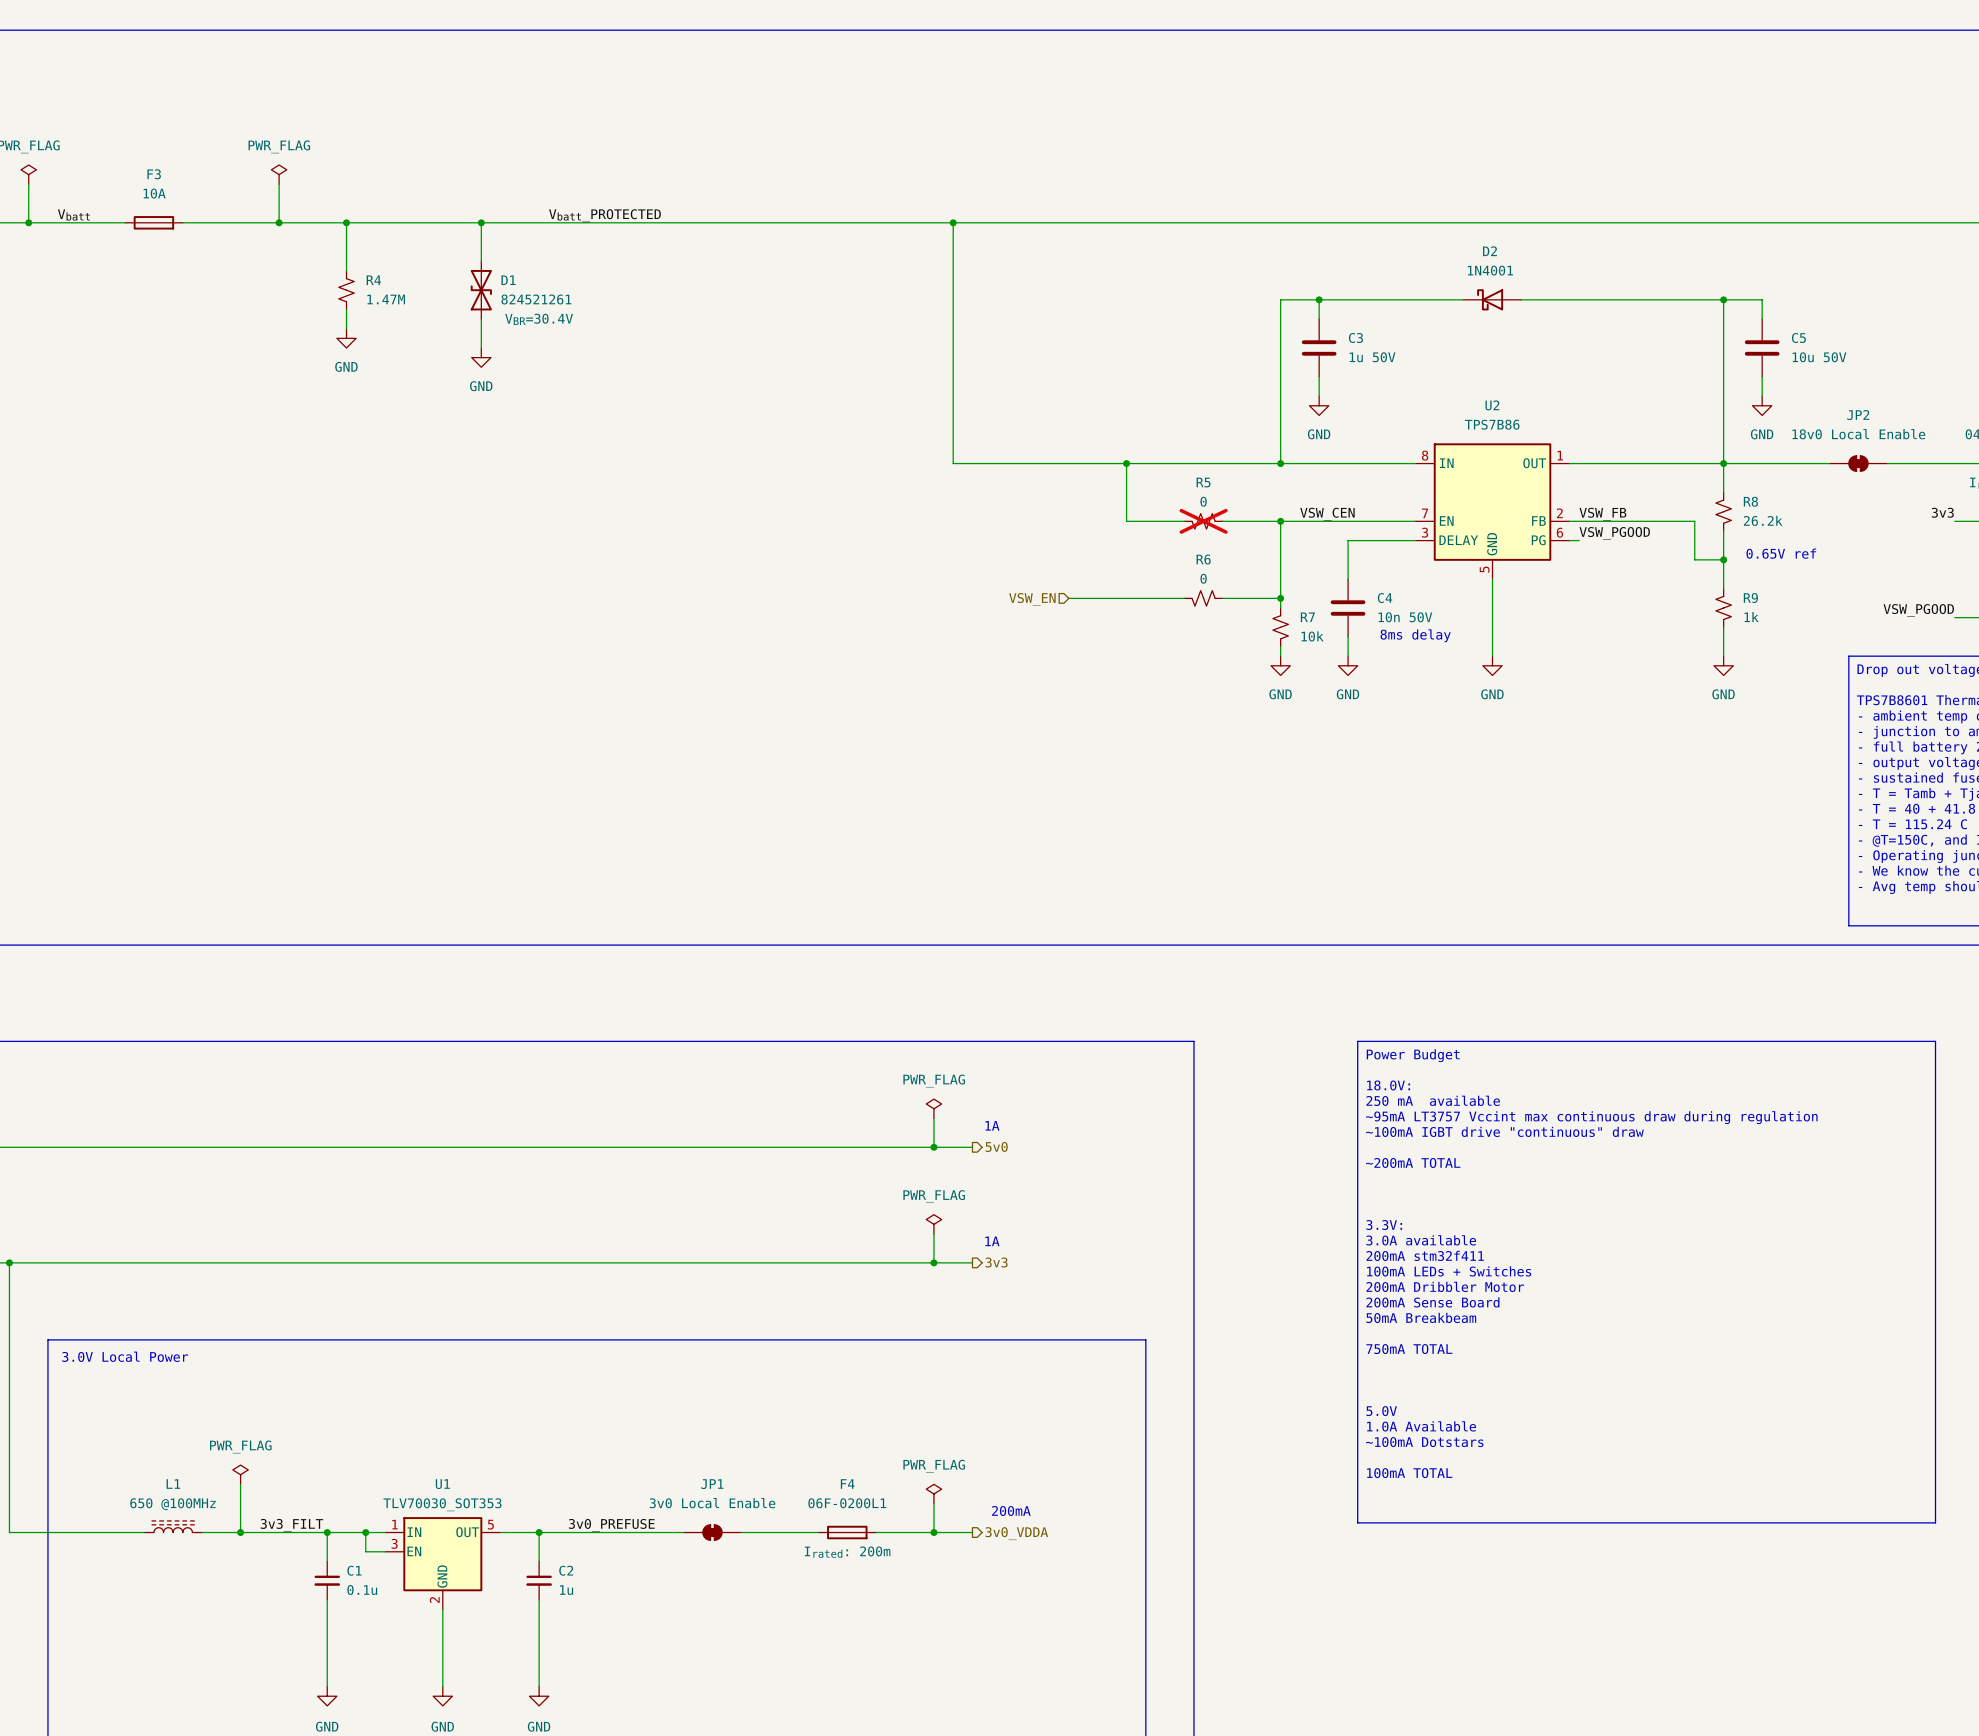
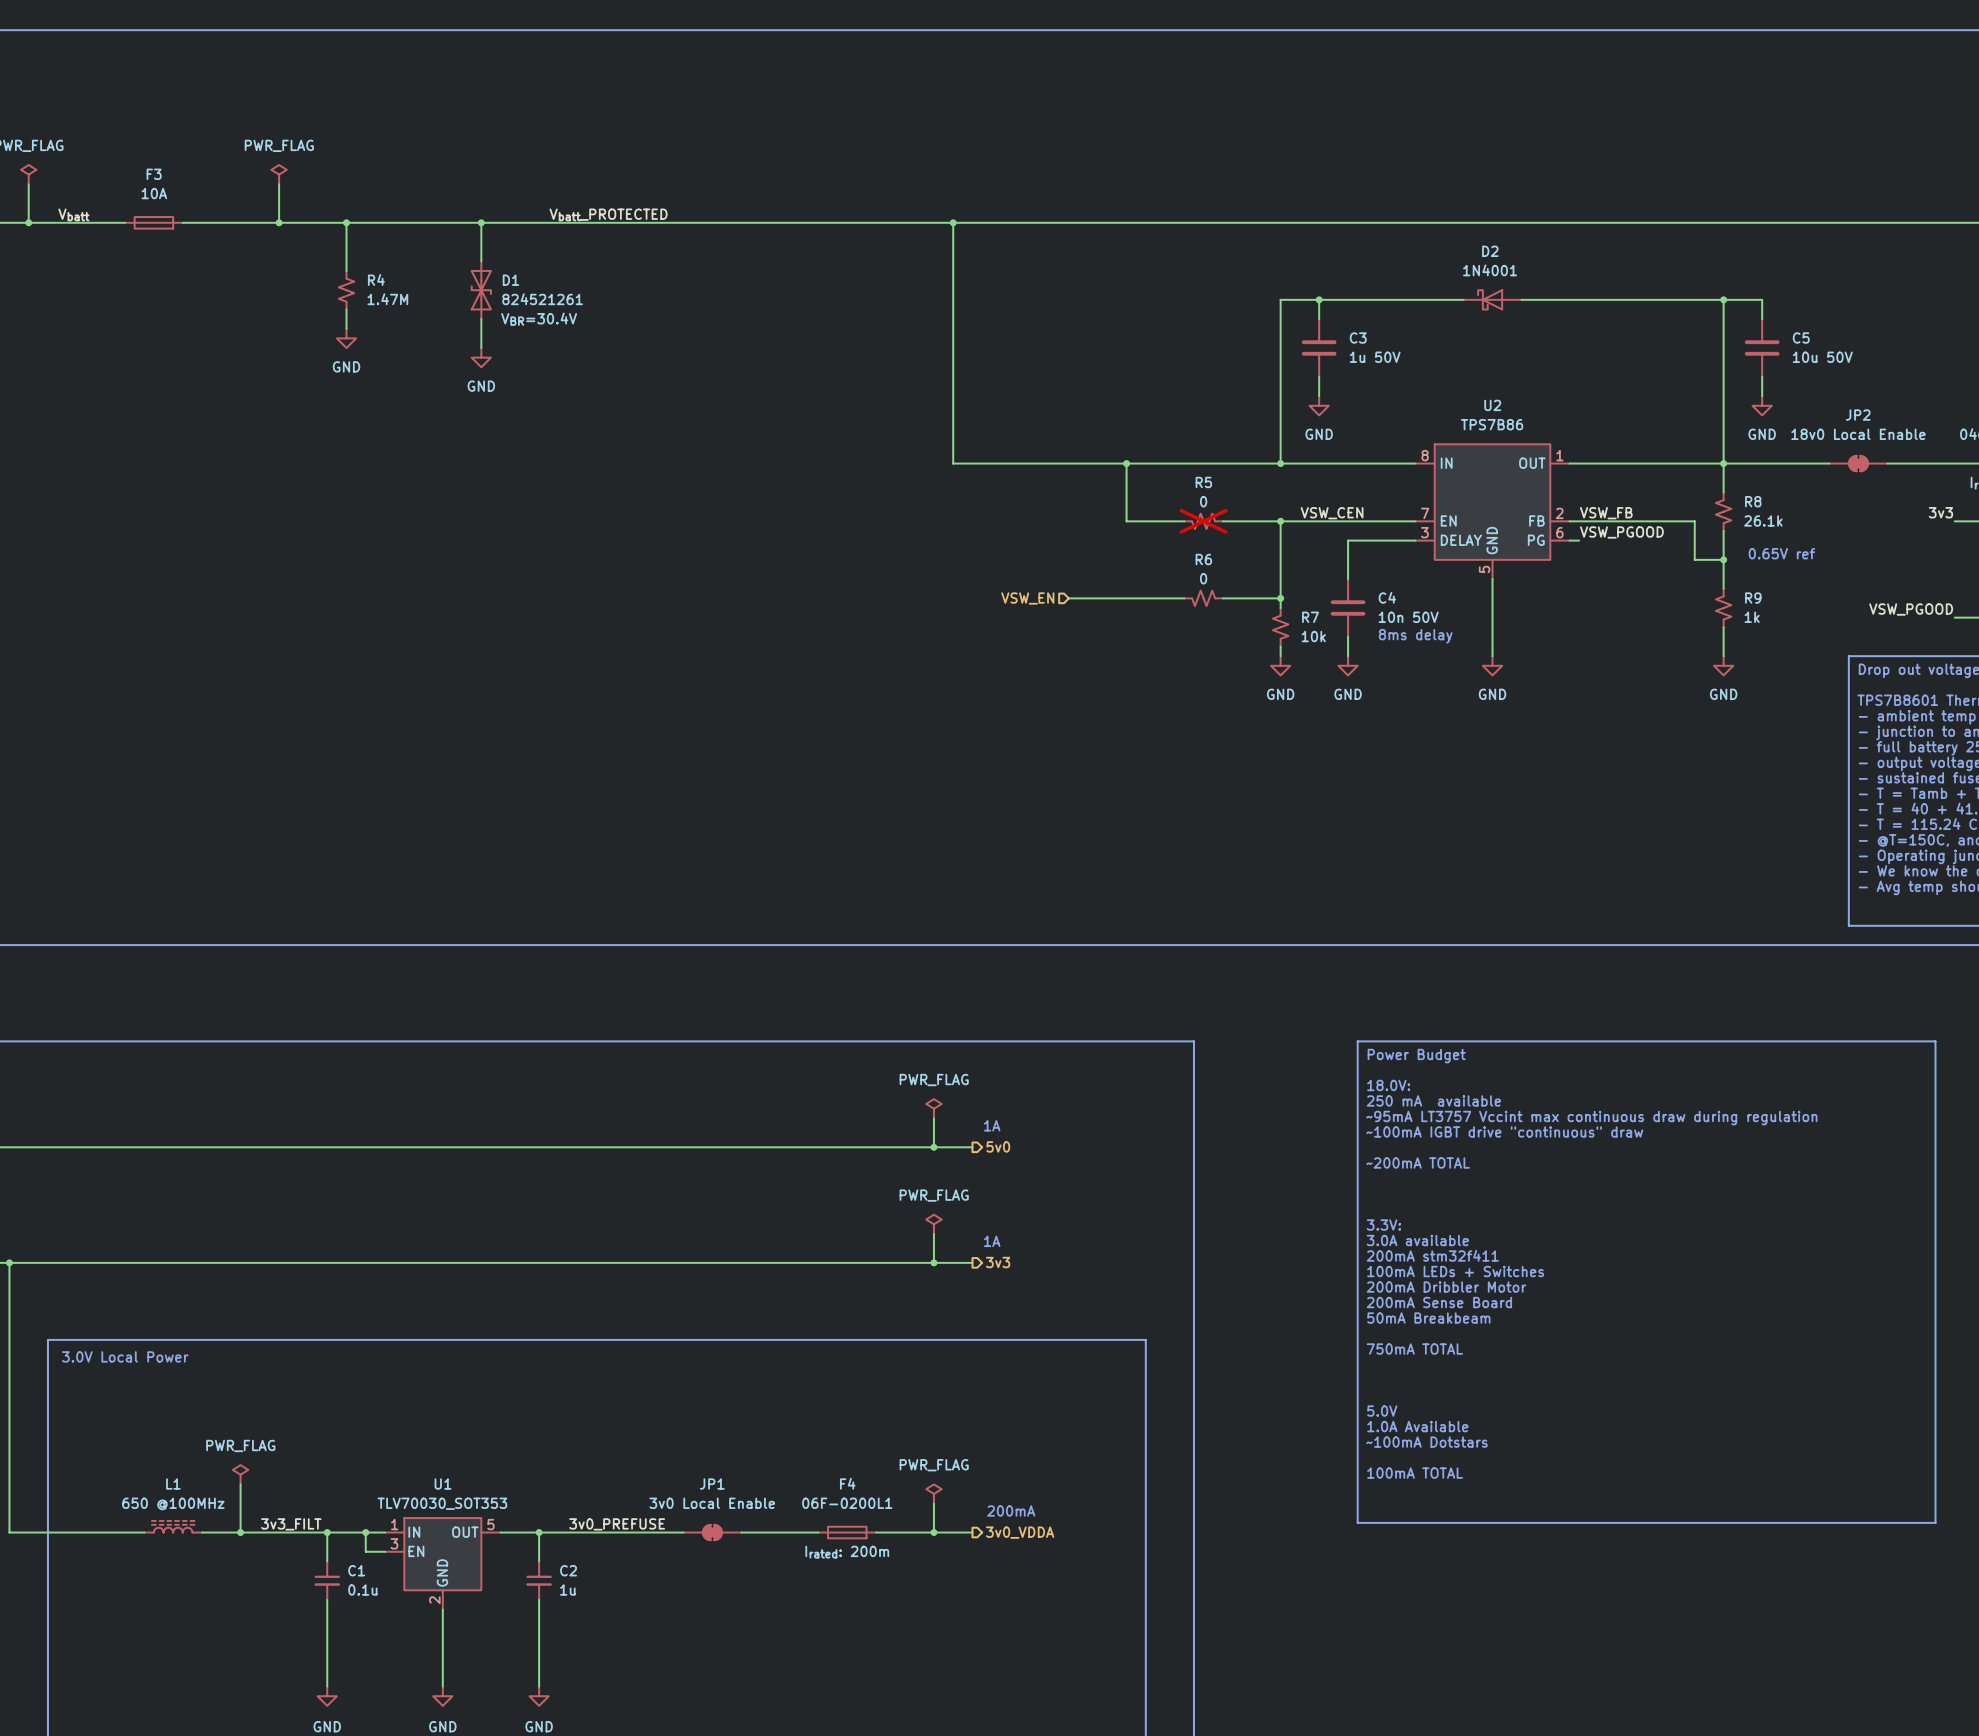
R8 value: 26.2k (1763, 520) -> 26.1k (1763, 520)

